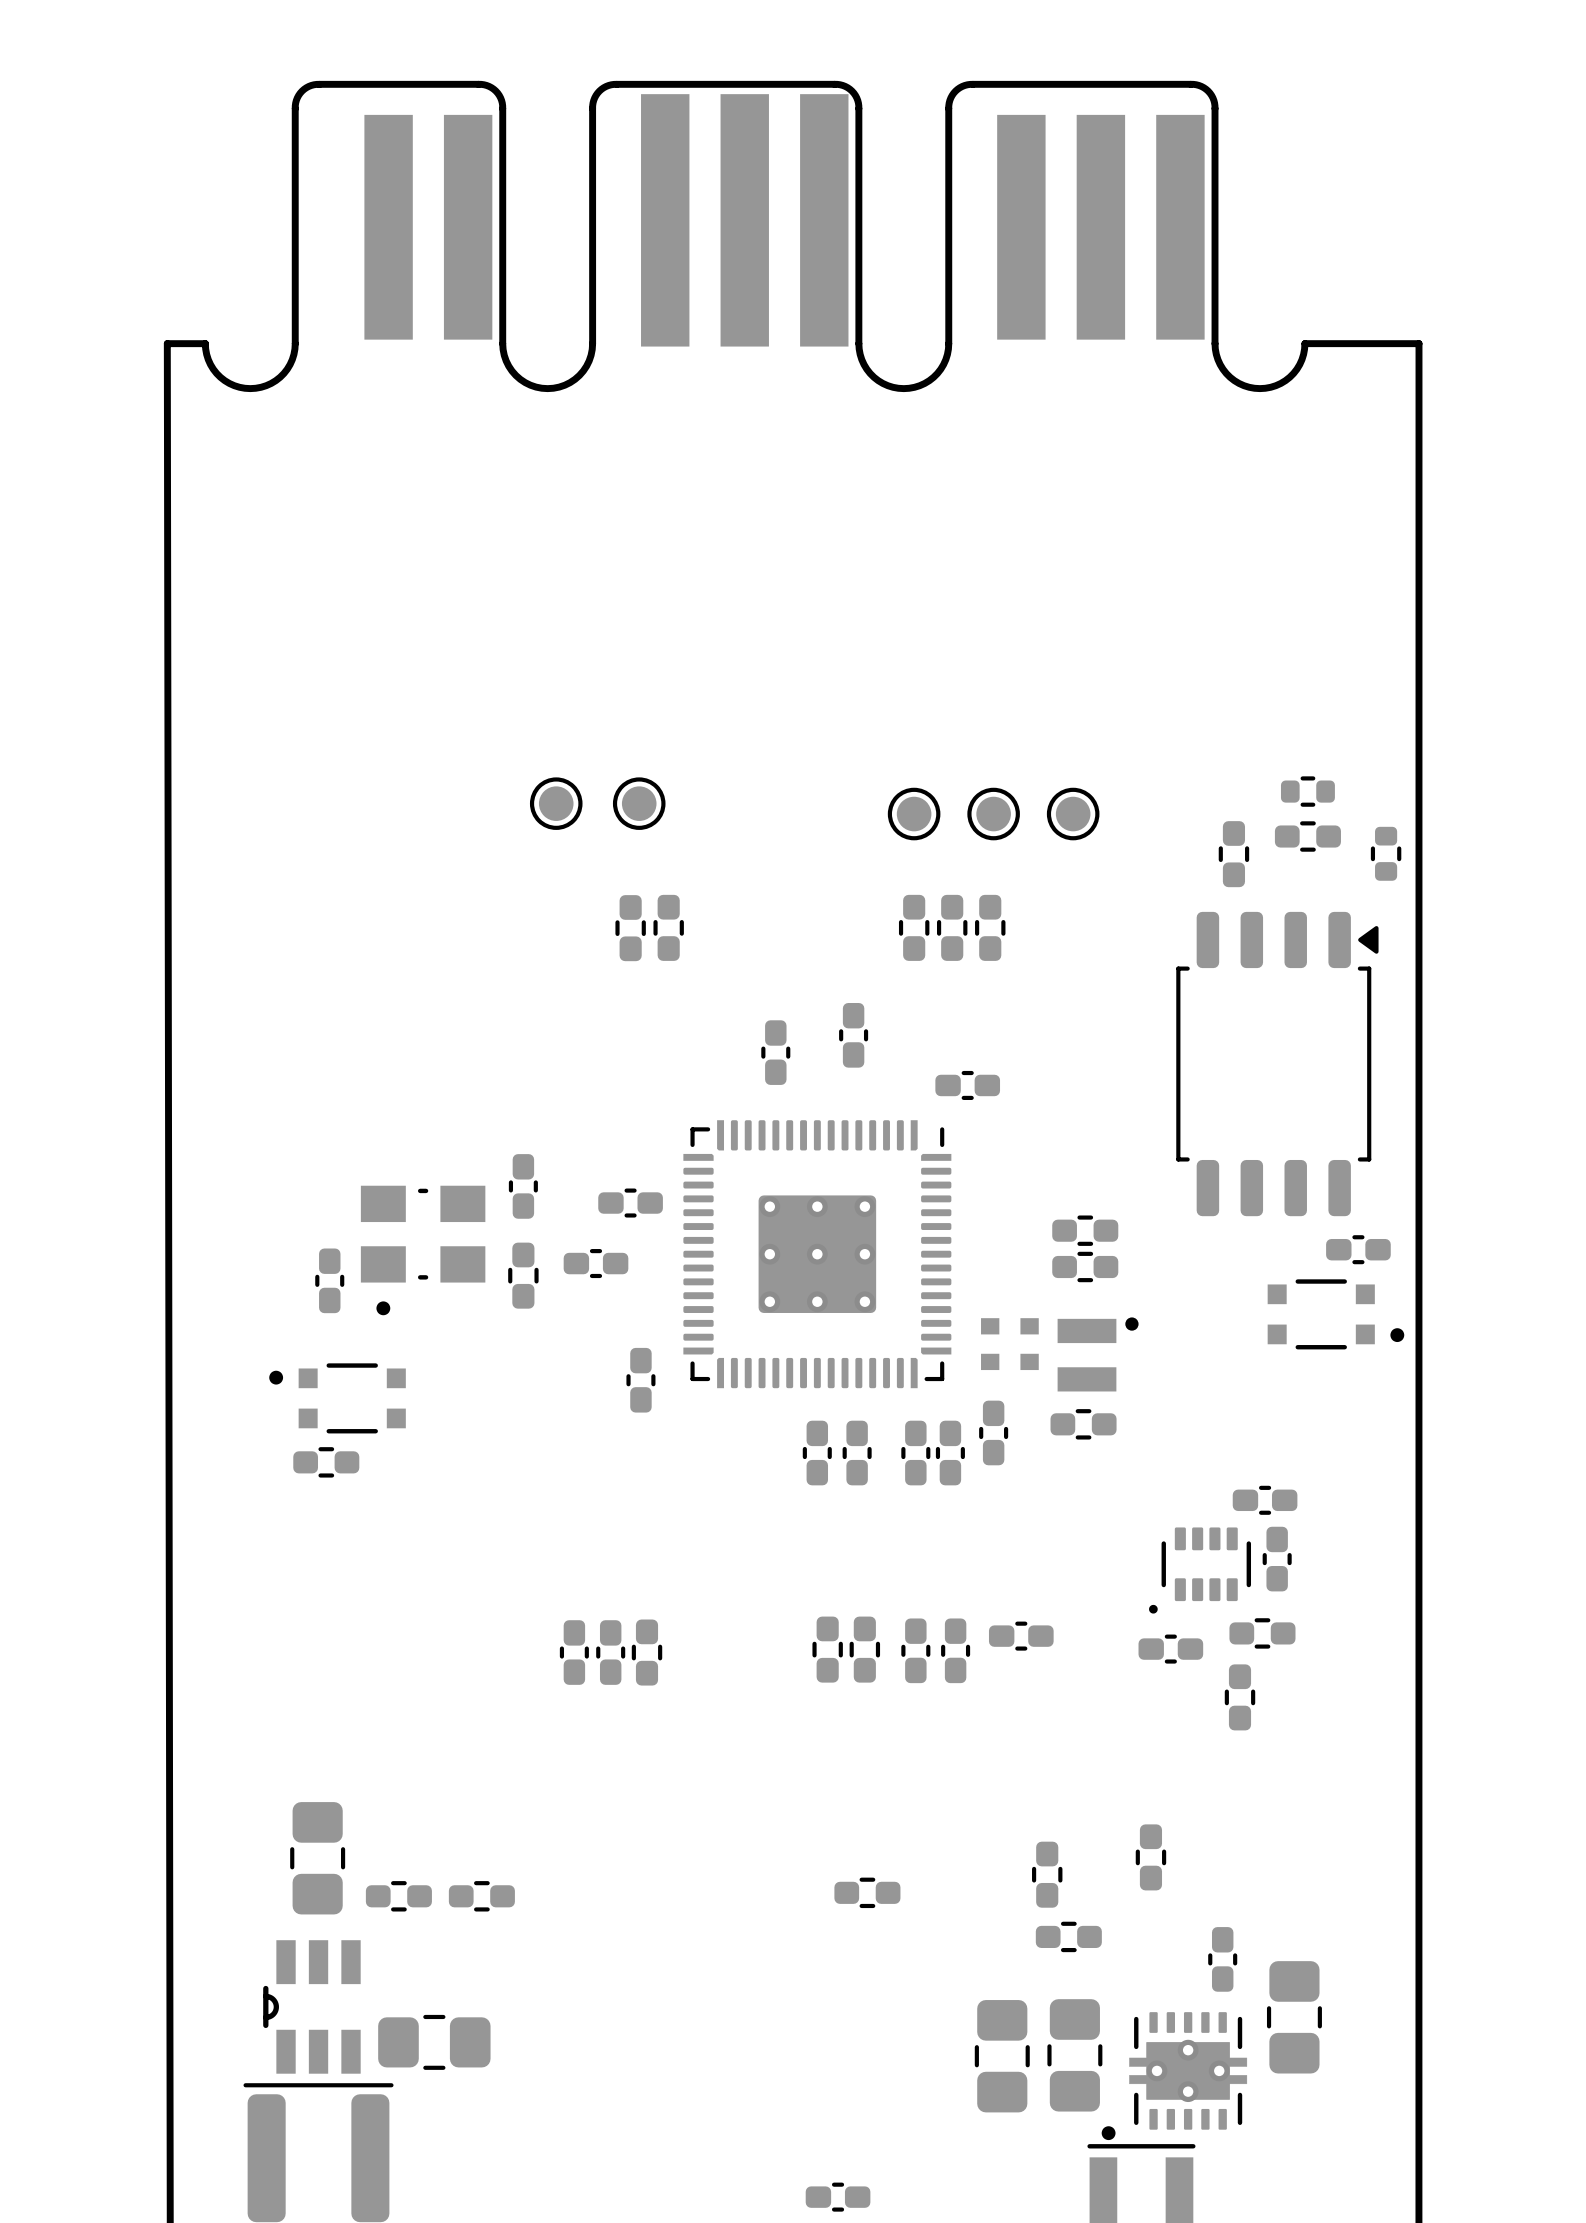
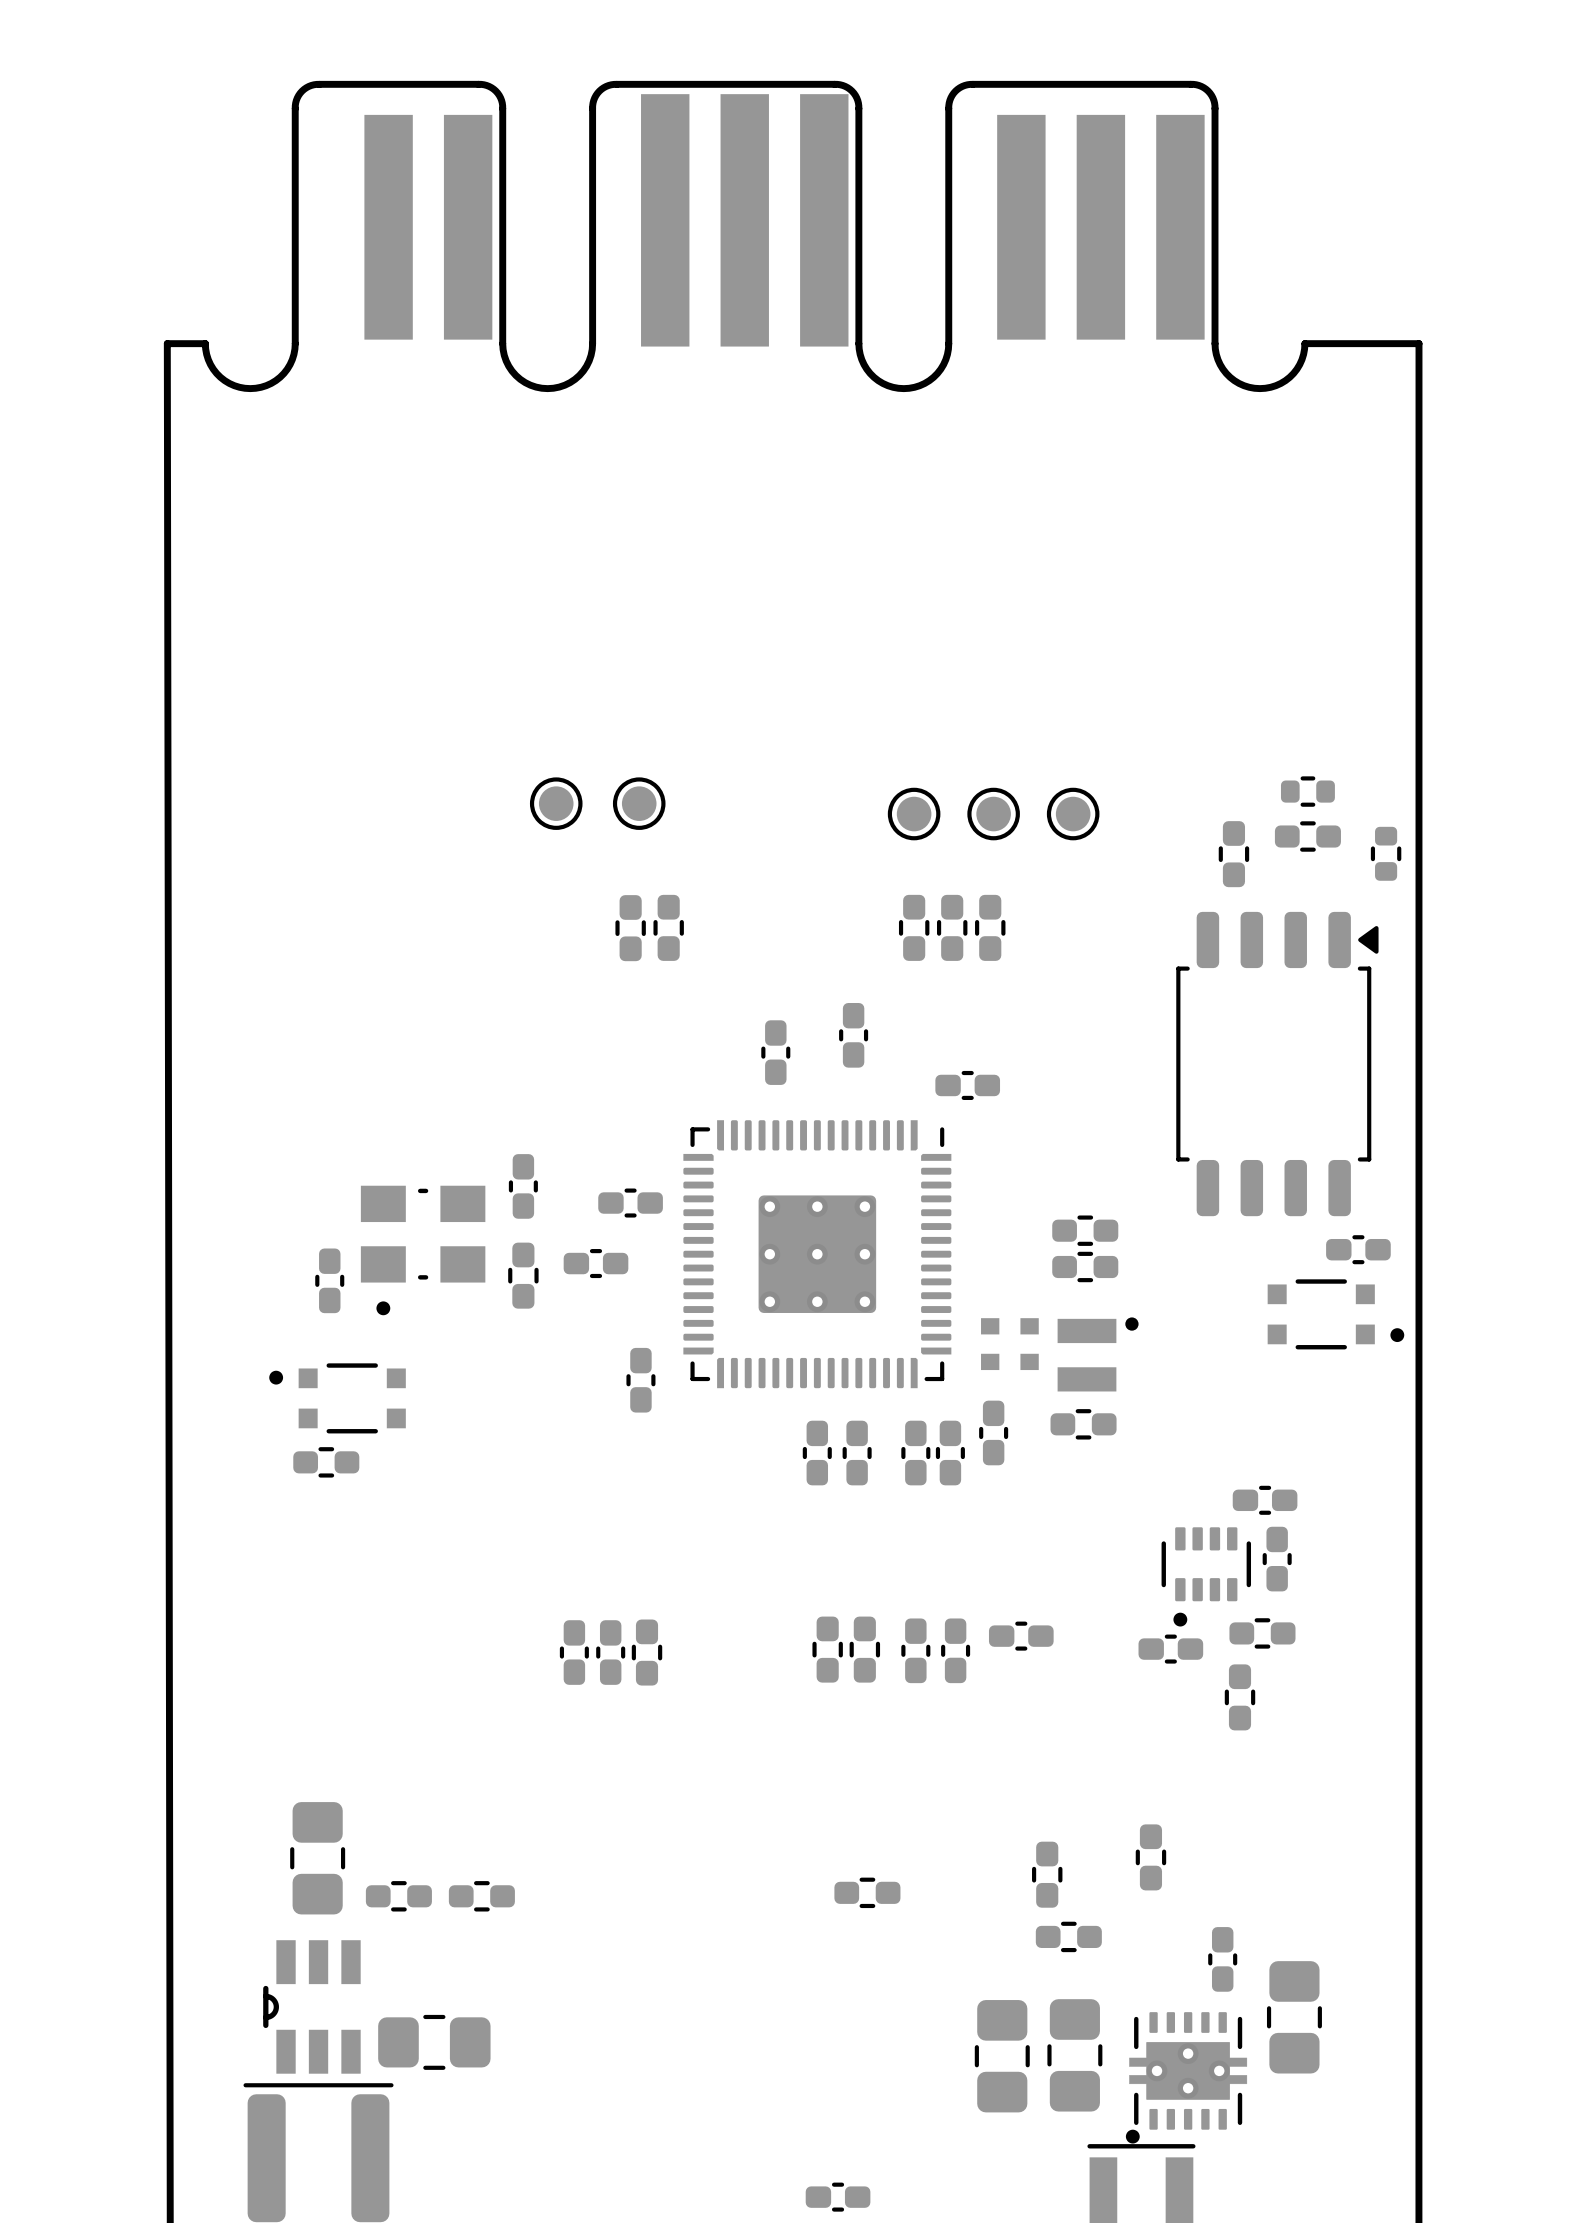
part footprint: [1149, 1527, 1252, 1614] -> [1161, 1527, 1252, 1627]
part footprint: [1101, 2012, 1248, 2141] -> [1125, 2012, 1248, 2144]

